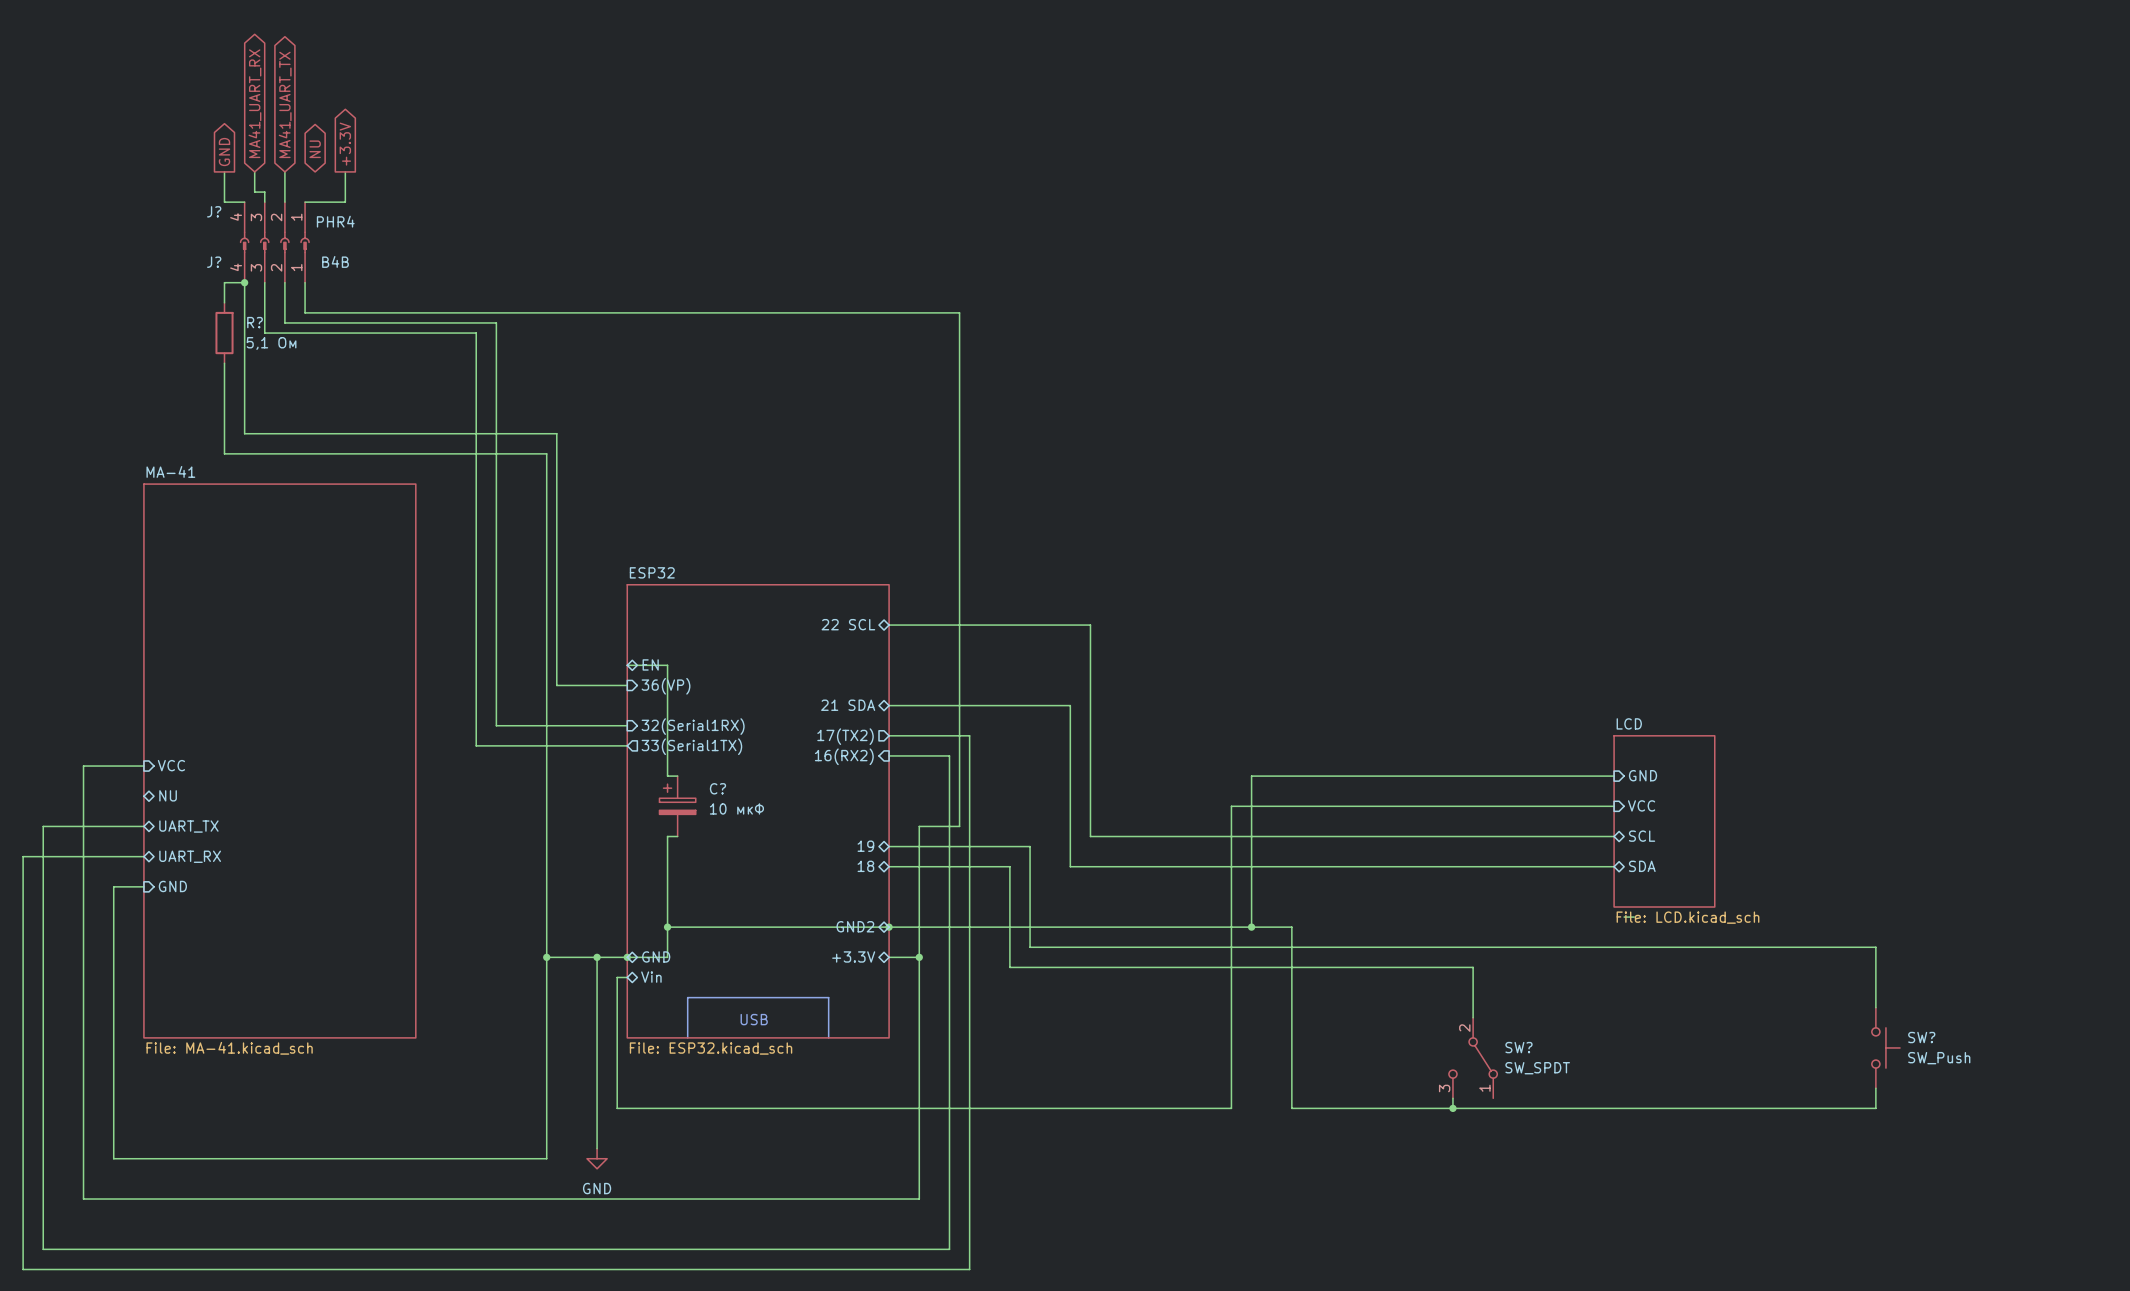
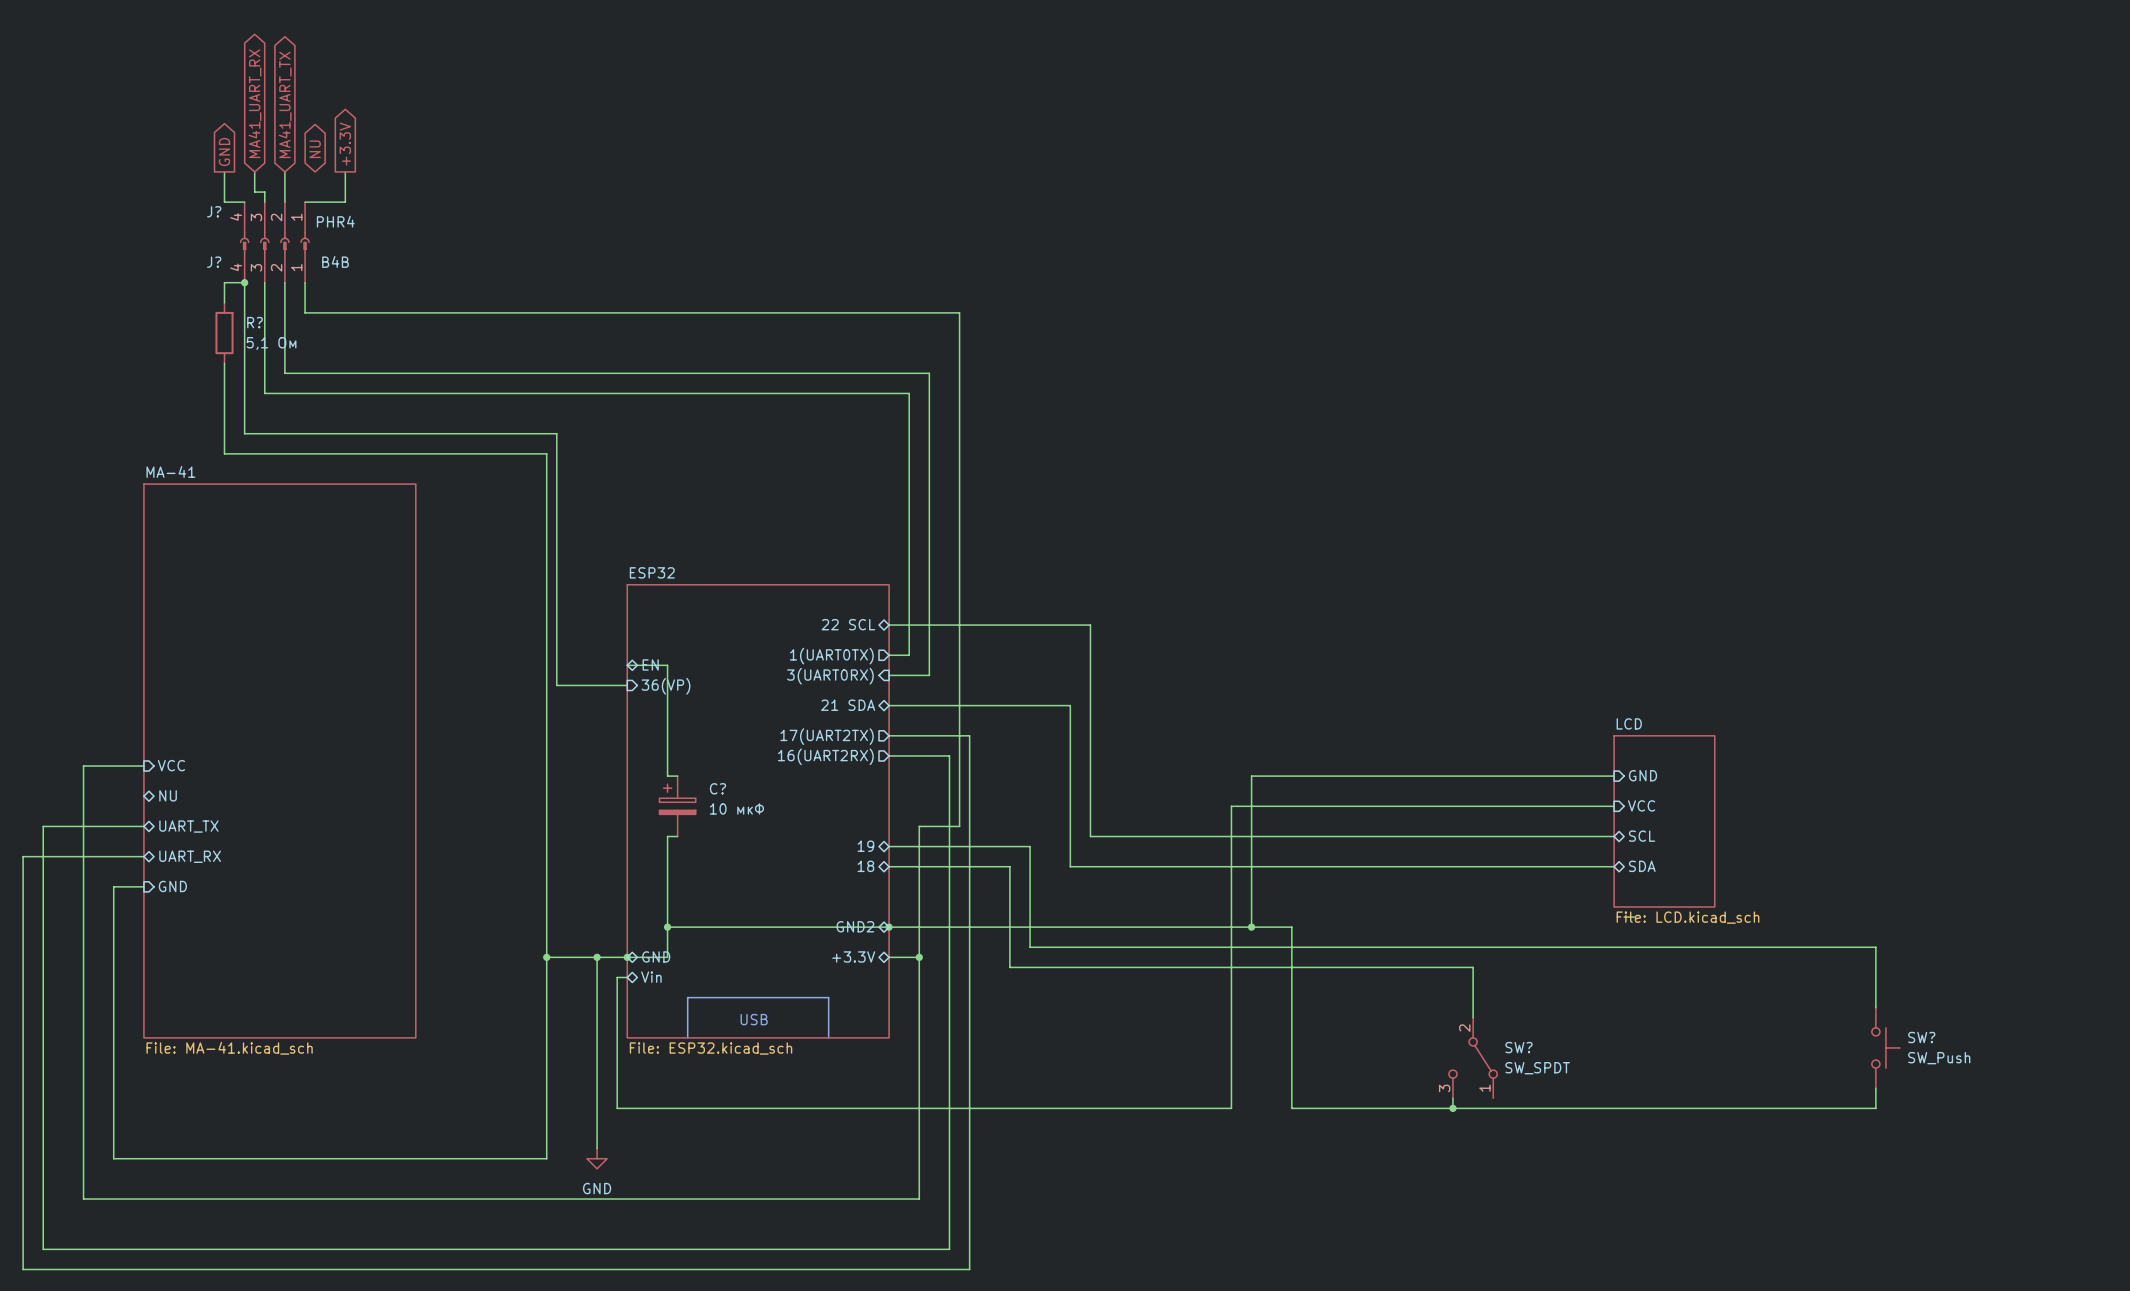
wire: (284, 322) (496, 322) (496, 725) (627, 725) -> (284, 322) (284, 373) (929, 373) (929, 675) (889, 675)
wire: (264, 333) (476, 333) (476, 745) (627, 745) -> (264, 333) (264, 393) (909, 393) (909, 655) (889, 655)
sheet pin: none -> 1(UART0TX) (831, 656)
sheet pin: none -> 3(UART0RX) (830, 676)
sheet pin: 32(Serial1RX) (693, 726) -> none
sheet pin: 17(TX2) (845, 736) -> 17(UART2TX) (827, 736)
sheet pin: 33(Serial1TX) (691, 746) -> none
sheet pin shape: input (844, 756) -> output (825, 756)
sheet pin: 16(RX2) (844, 756) -> 16(UART2RX) (825, 756)

